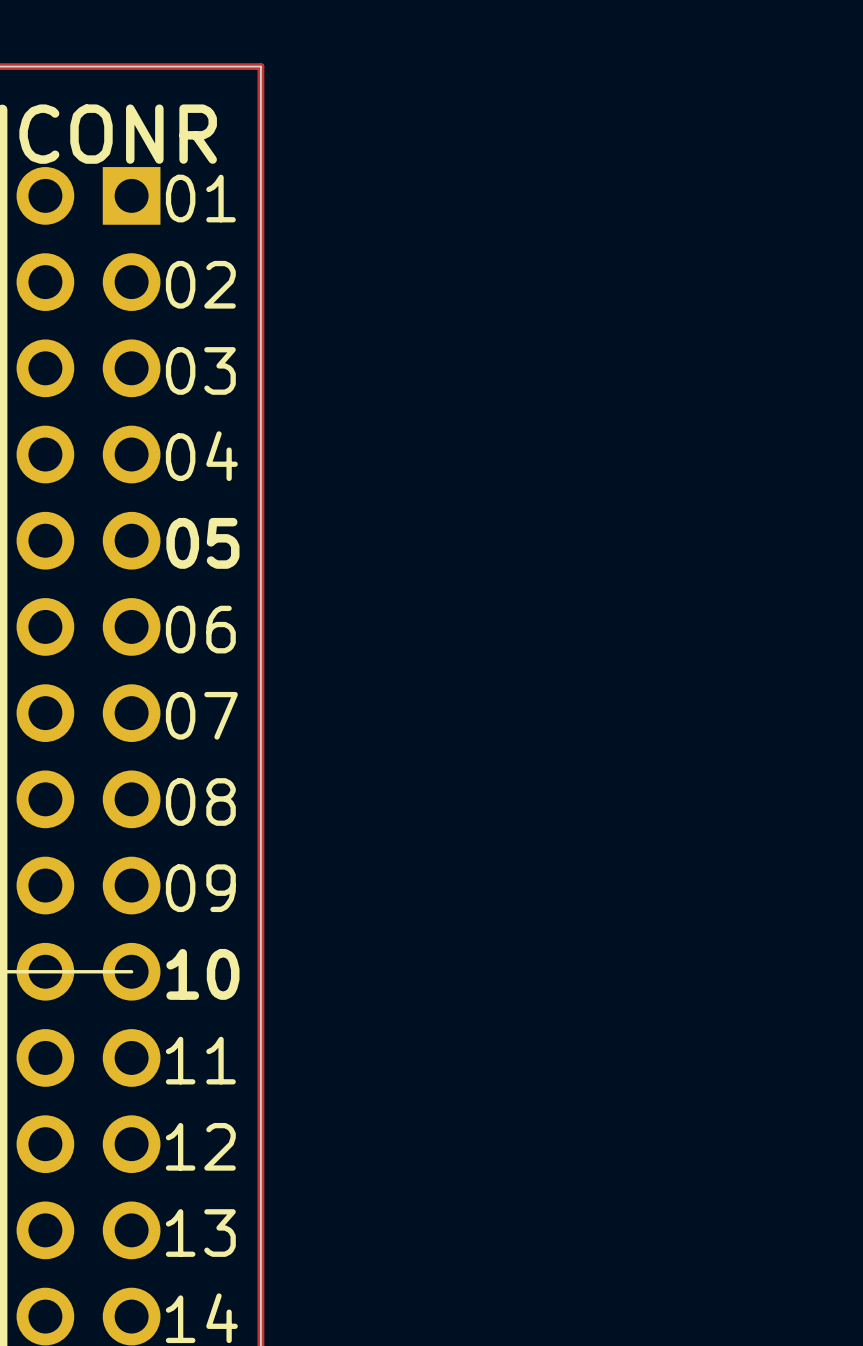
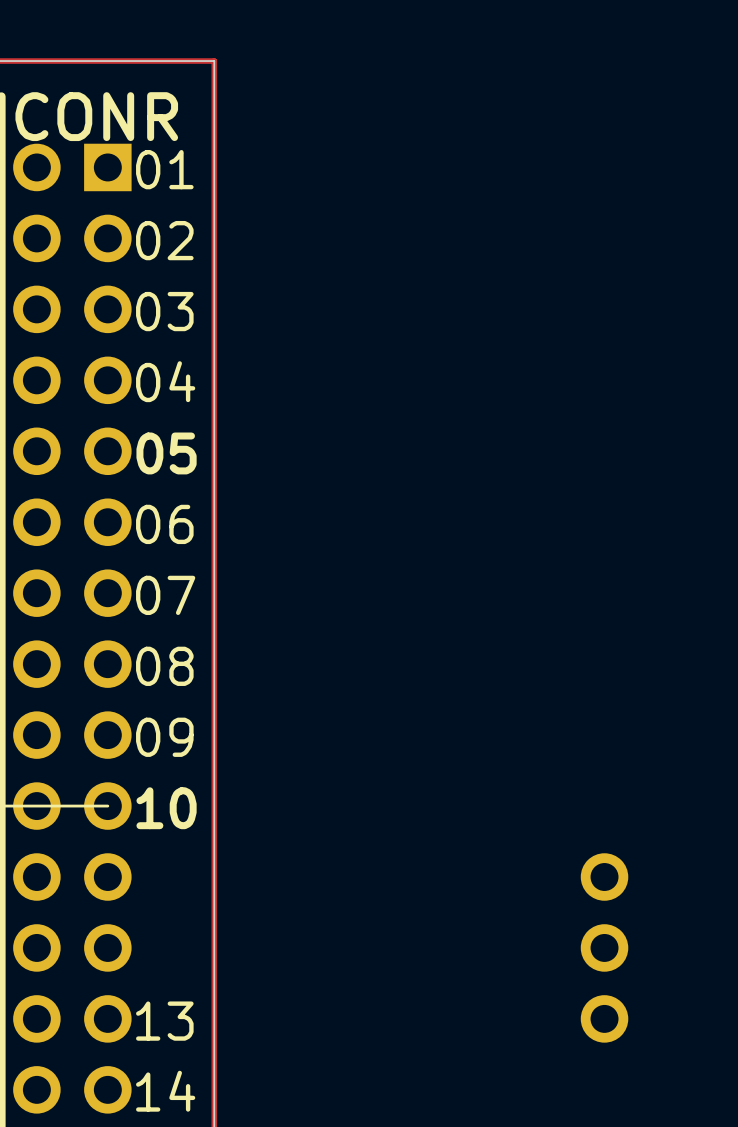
part: none -> (604, 877)
text: 11 (200, 1060) -> none
part: none -> (604, 947)
text: 12 (200, 1146) -> none
part: none -> (604, 1018)

